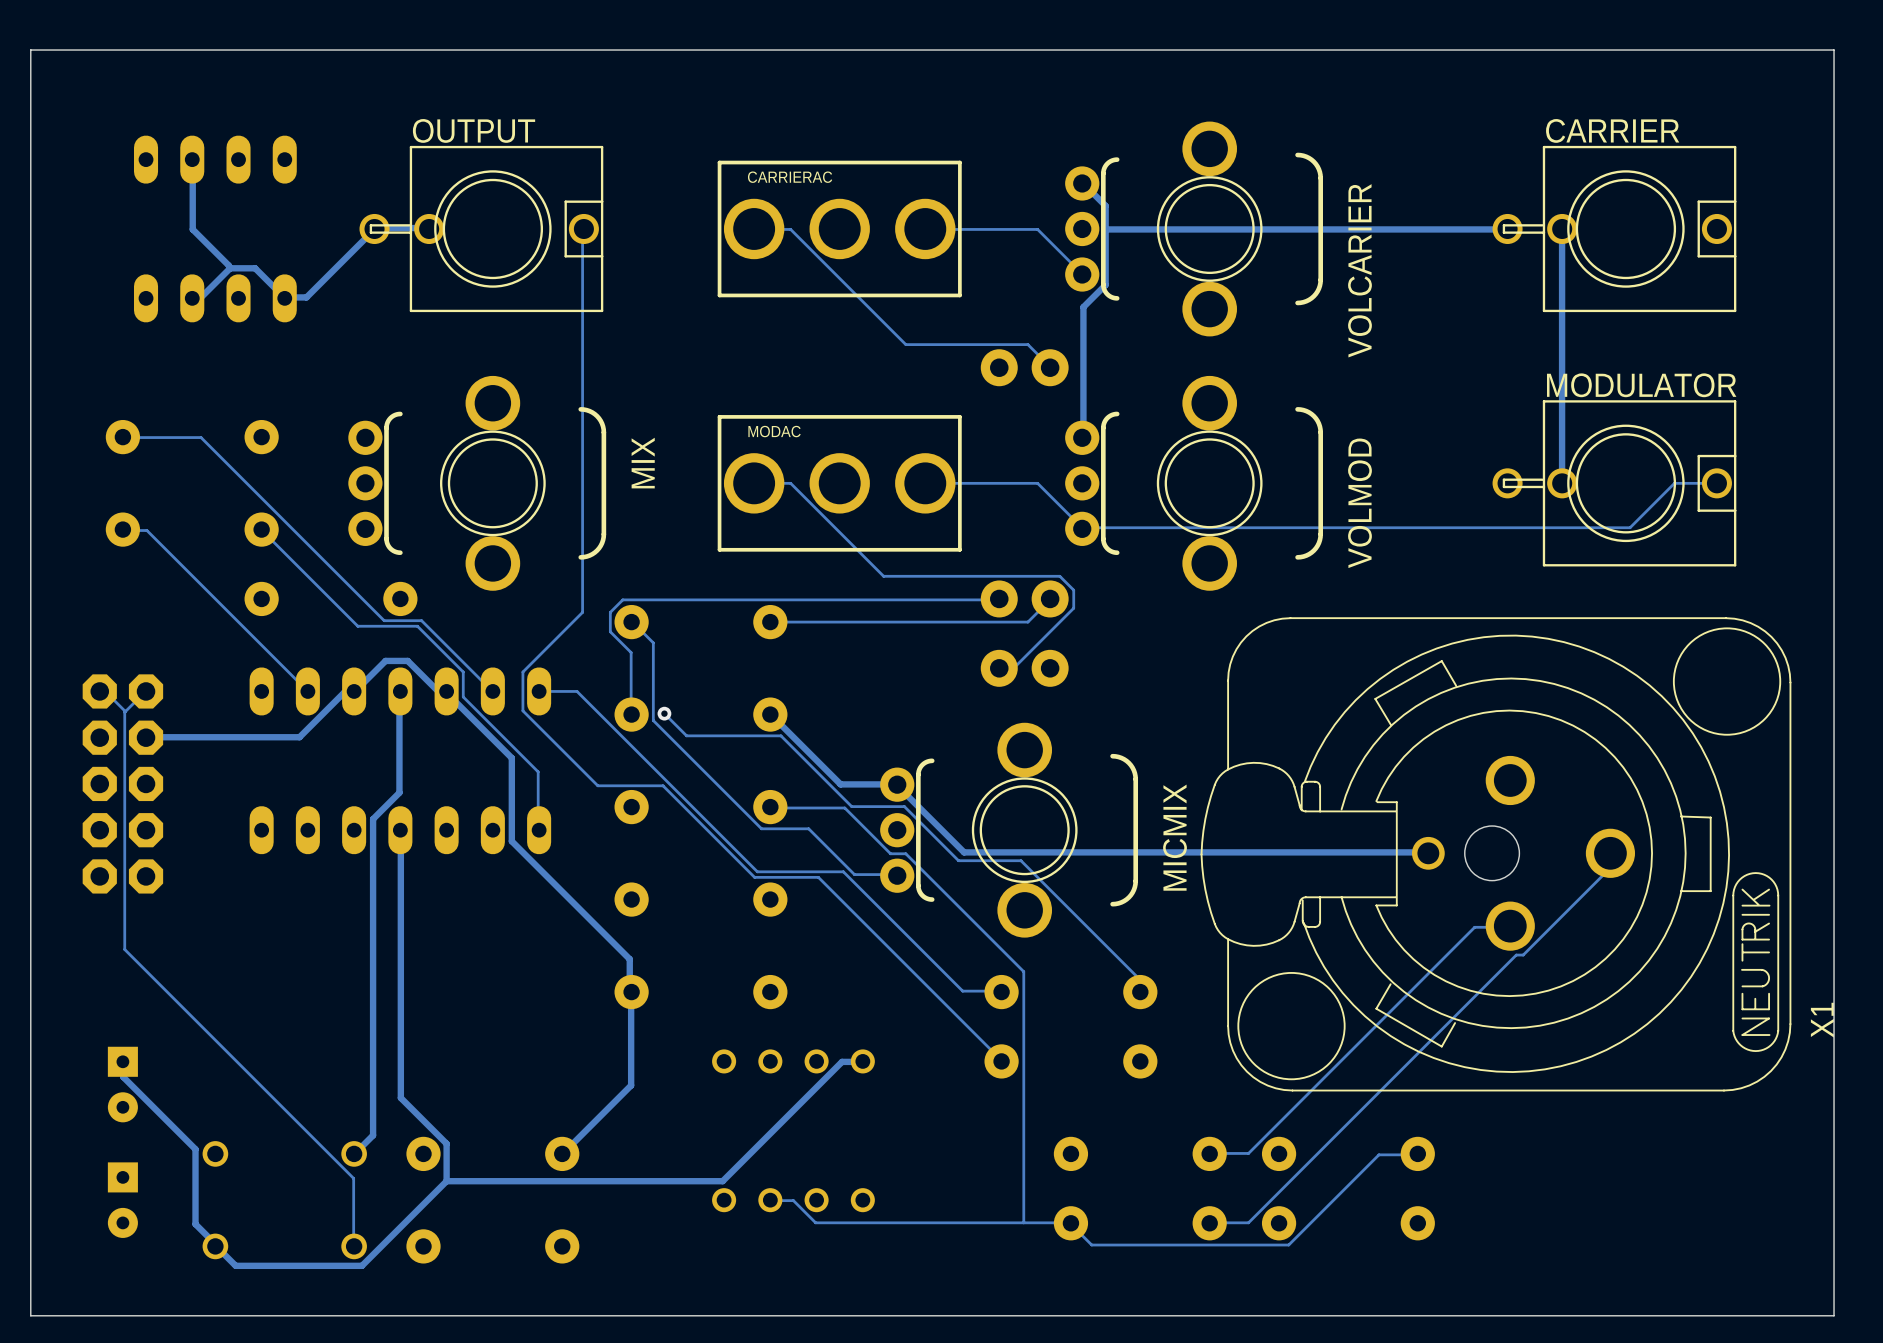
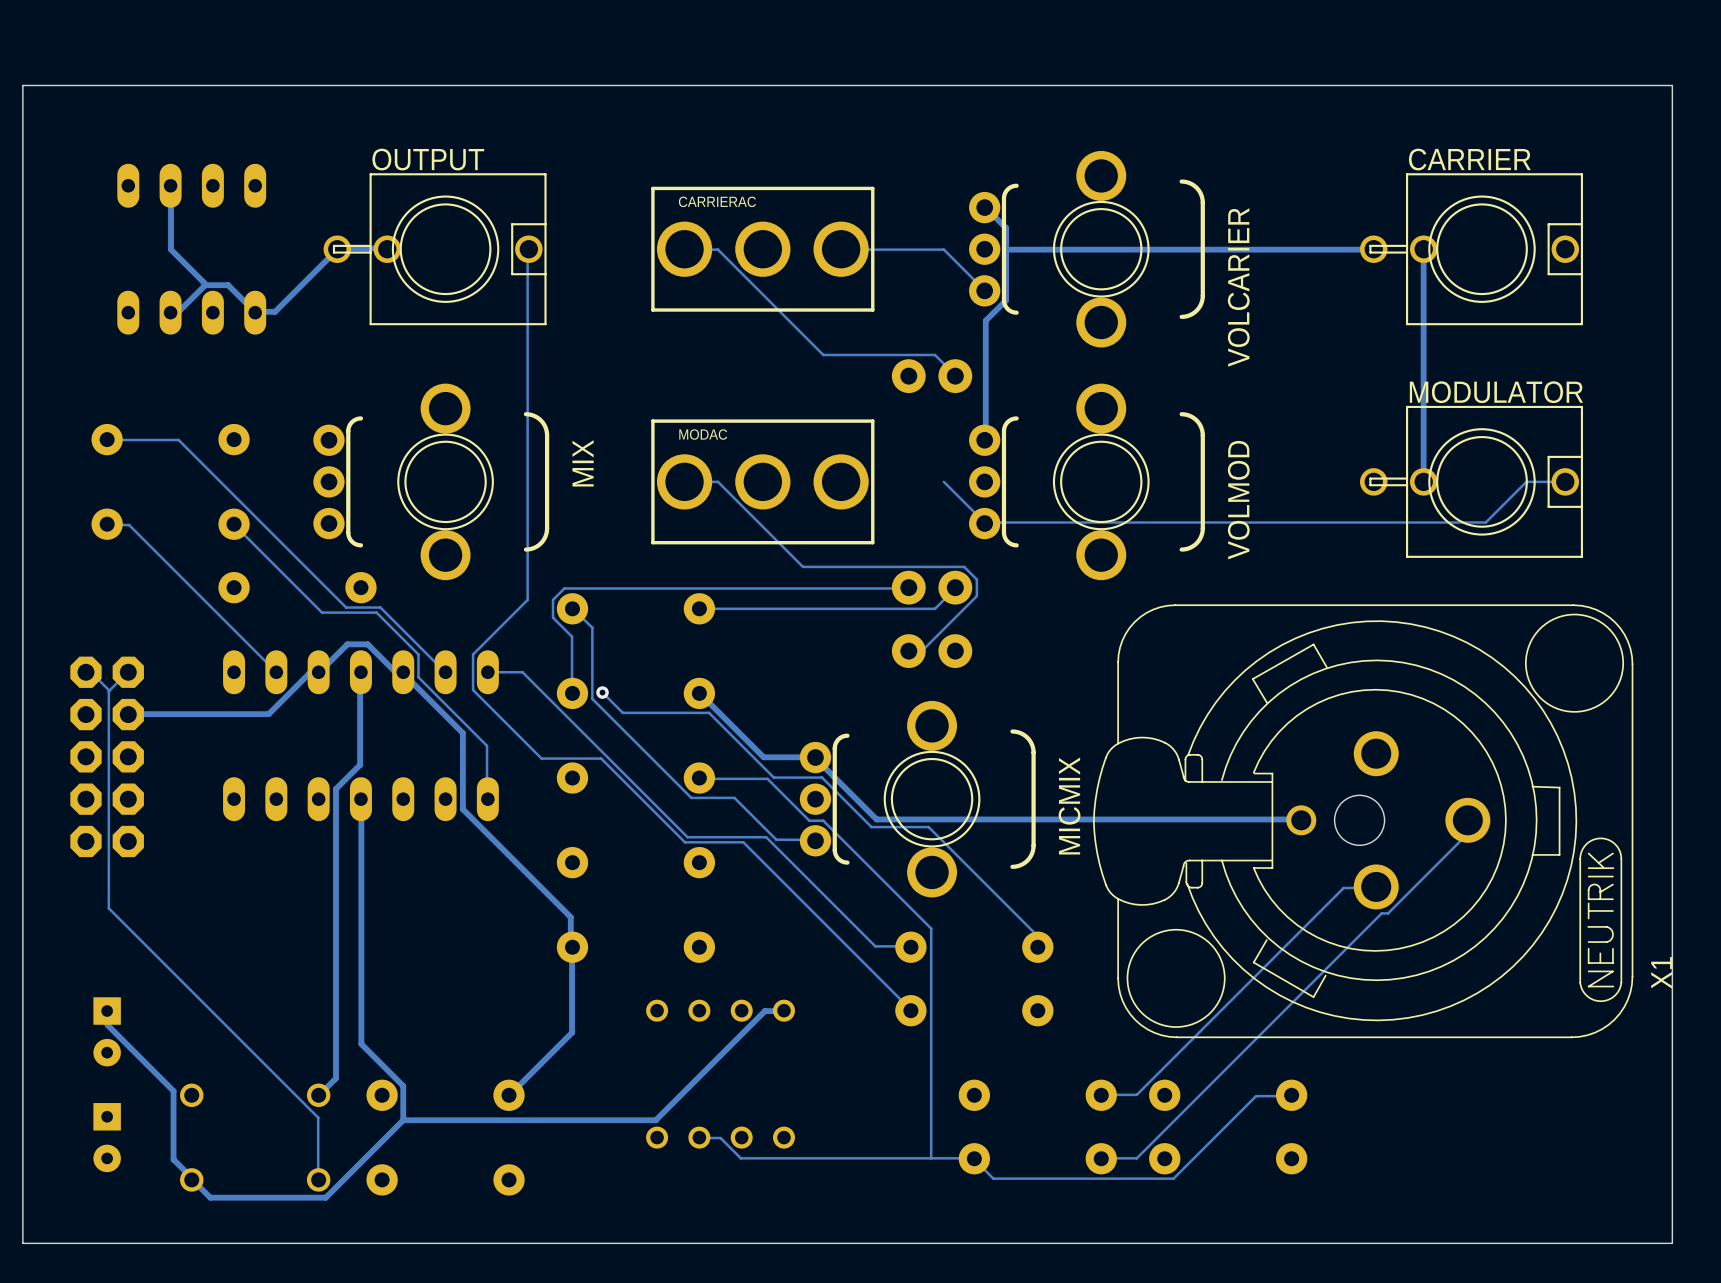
track: (1037, 483) (925, 483) -> none

